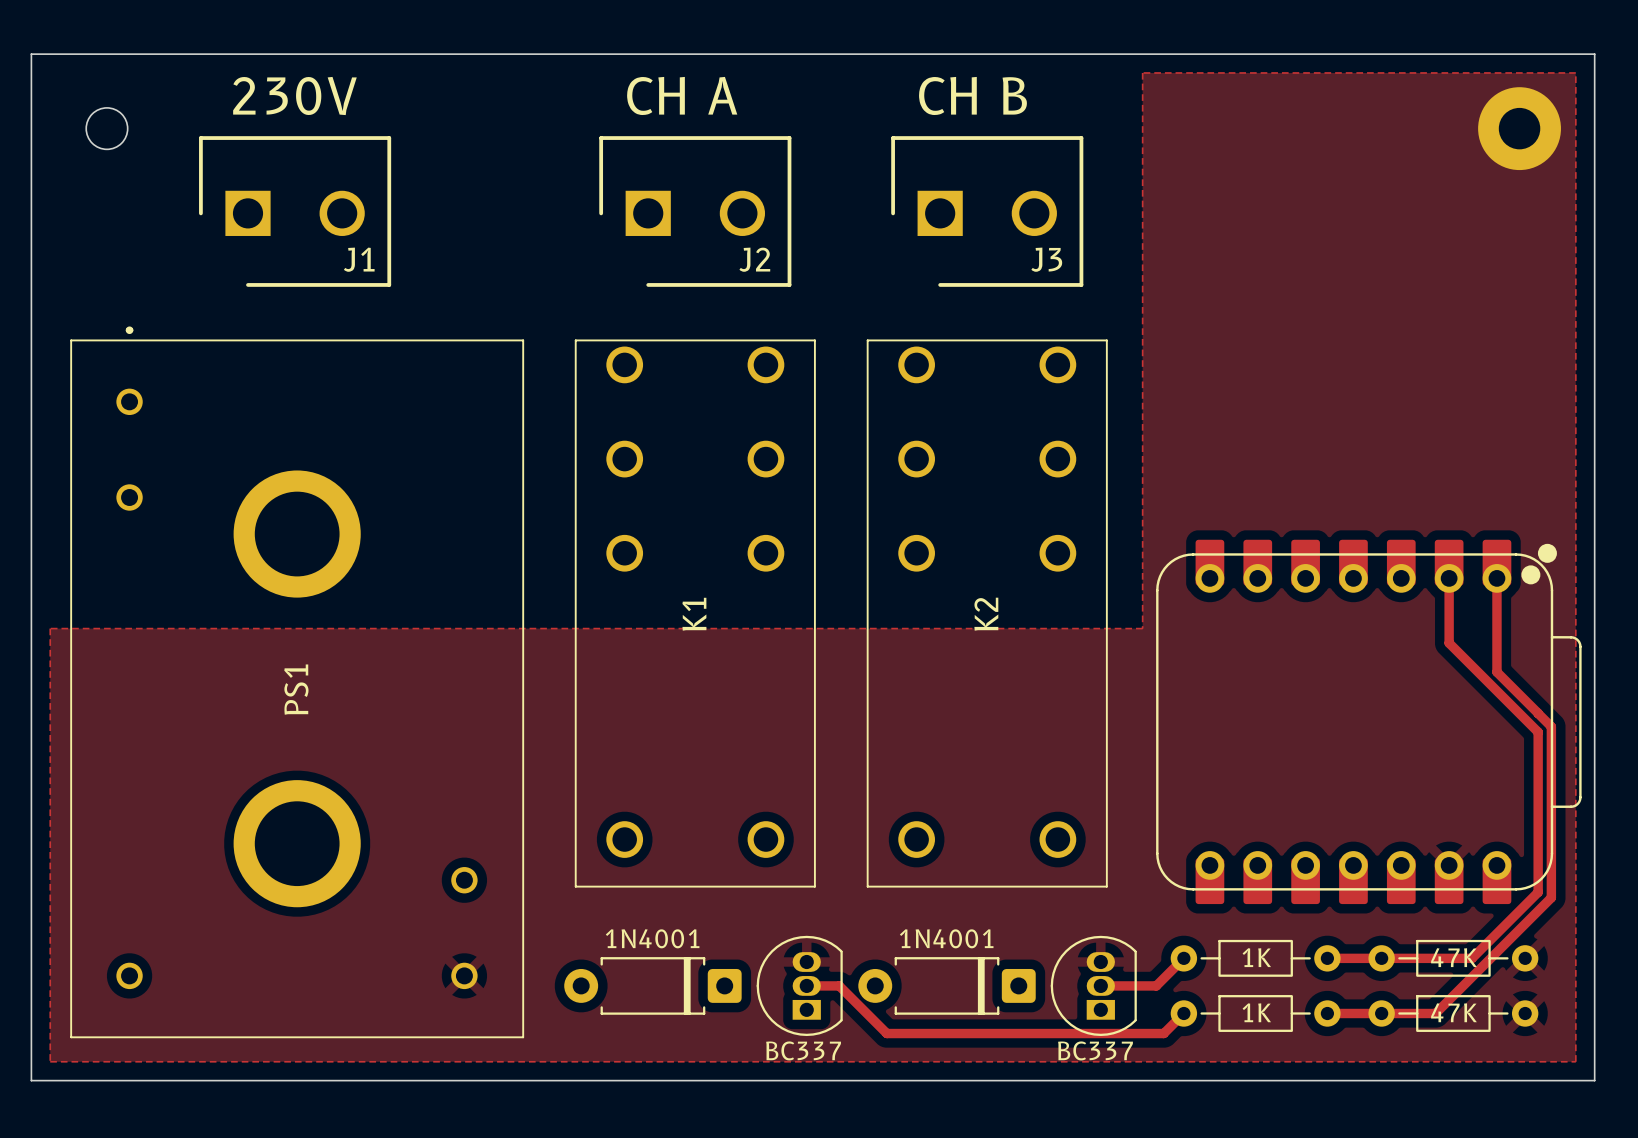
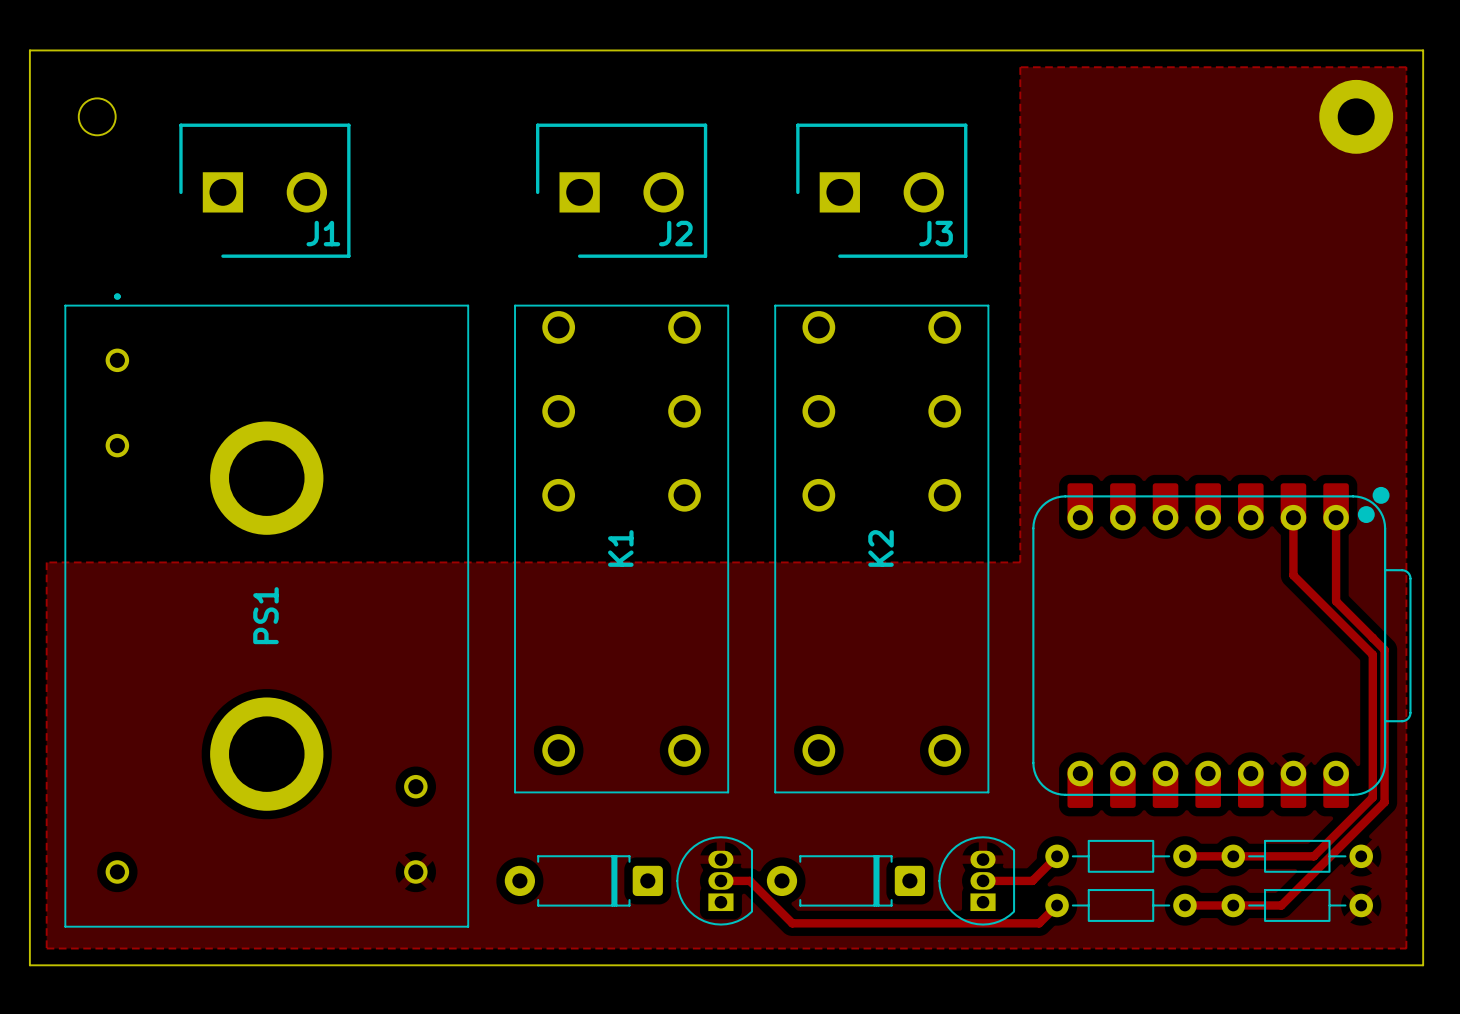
text: CH A (682, 95) -> none
text: CH B (972, 95) -> none
text: 230V (294, 96) -> none
part value: 1N4001 (652, 938) -> none
part value: 1N4001 (946, 938) -> none
part value: 1K (1256, 957) -> none
part value: 47K (1453, 957) -> none
part value: 1K (1256, 1012) -> none
part value: 47K (1453, 1012) -> none
part value: BC337 (803, 1050) -> none
part value: BC337 (1095, 1050) -> none

